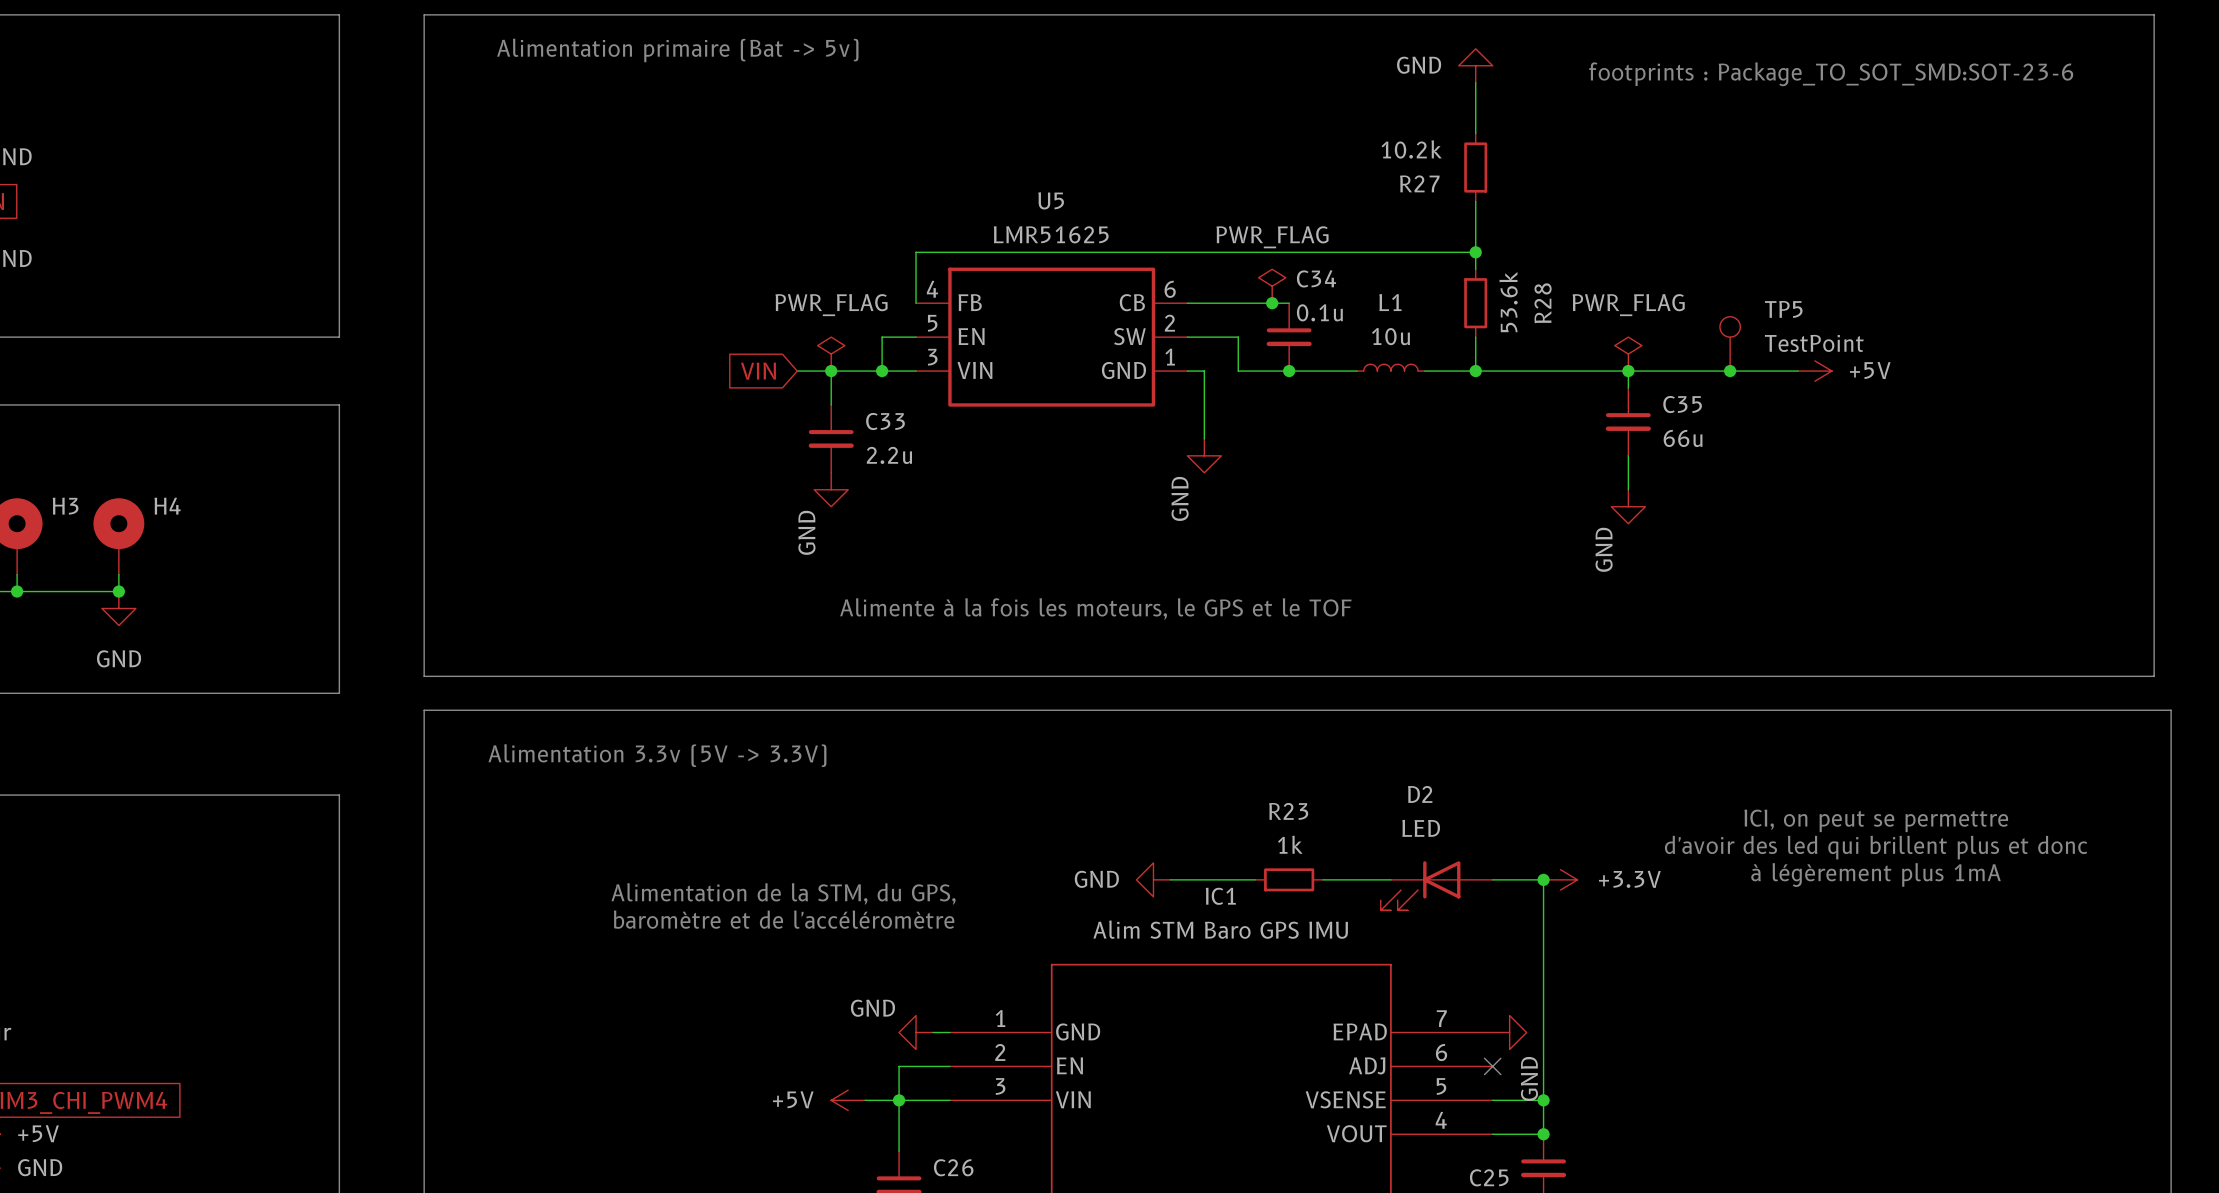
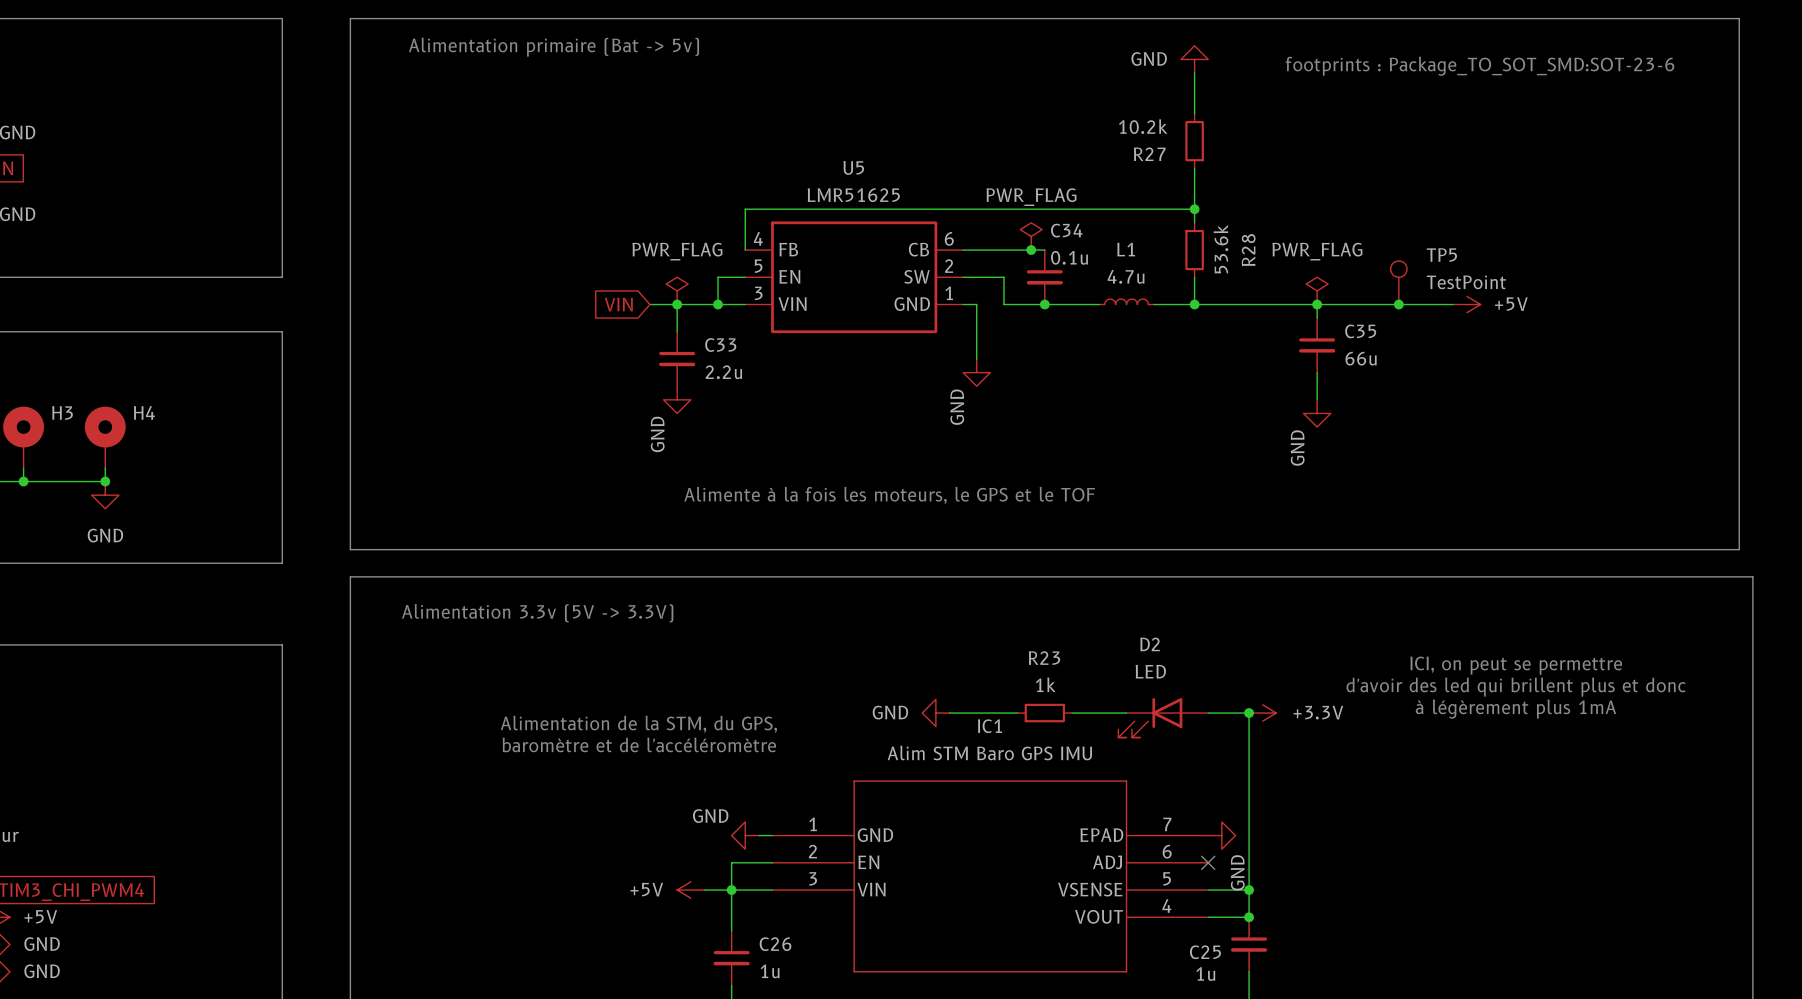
L1 value: 10u (1390, 336) -> 4.7u (1126, 276)

